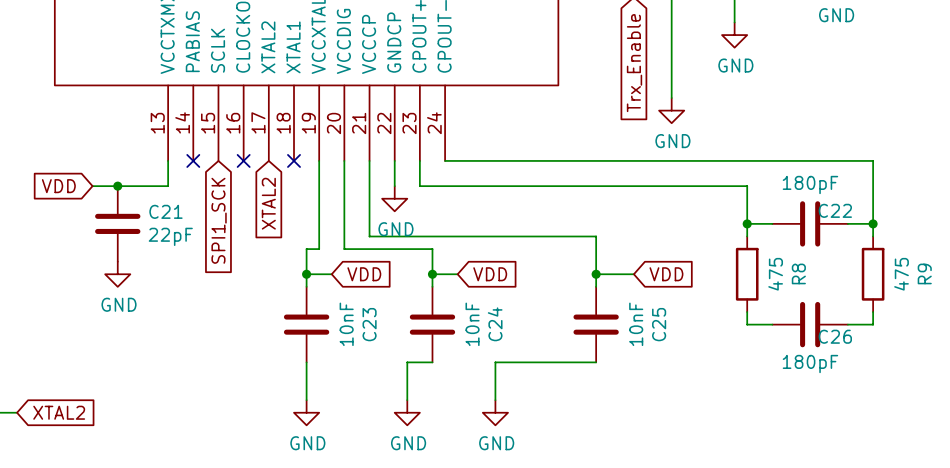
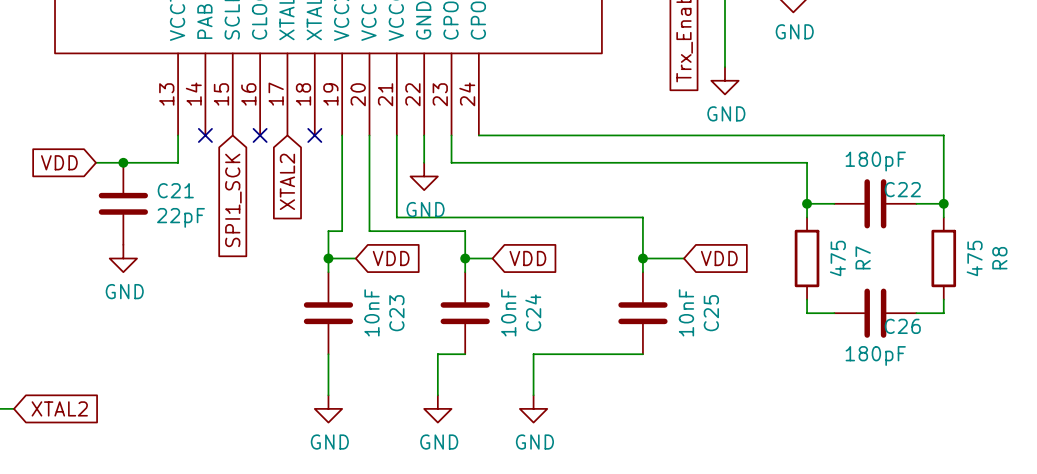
R8 name: R8 (798, 273) -> R7 (863, 257)
R9 name: R9 (924, 273) -> R8 (999, 258)

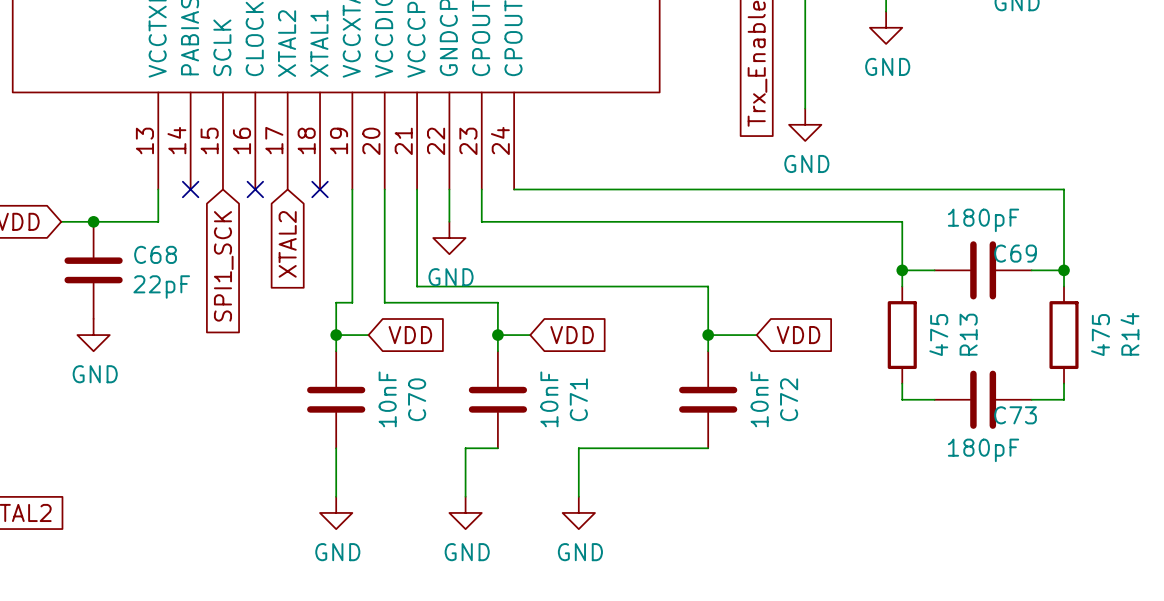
C22 name: C22 (902, 189) -> C69 (1015, 253)
C21 name: C21 (175, 190) -> C68 (155, 254)
R7 name: R7 (863, 257) -> R13 (968, 334)
R8 name: R8 (999, 258) -> R14 (1129, 334)
C24 name: C24 (533, 312) -> C71 (578, 399)
C23 name: C23 (396, 313) -> C70 (417, 399)
C25 name: C25 (711, 313) -> C72 (789, 399)
C26 name: C26 (902, 326) -> C73 (1015, 415)

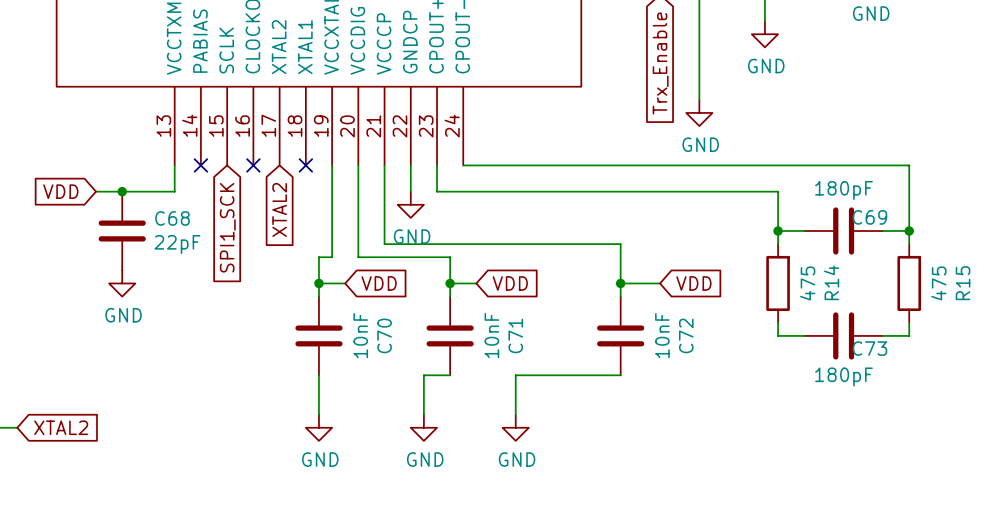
R13 name: R13 (968, 334) -> R14 (831, 282)
R14 name: R14 (1129, 334) -> R15 (963, 283)

